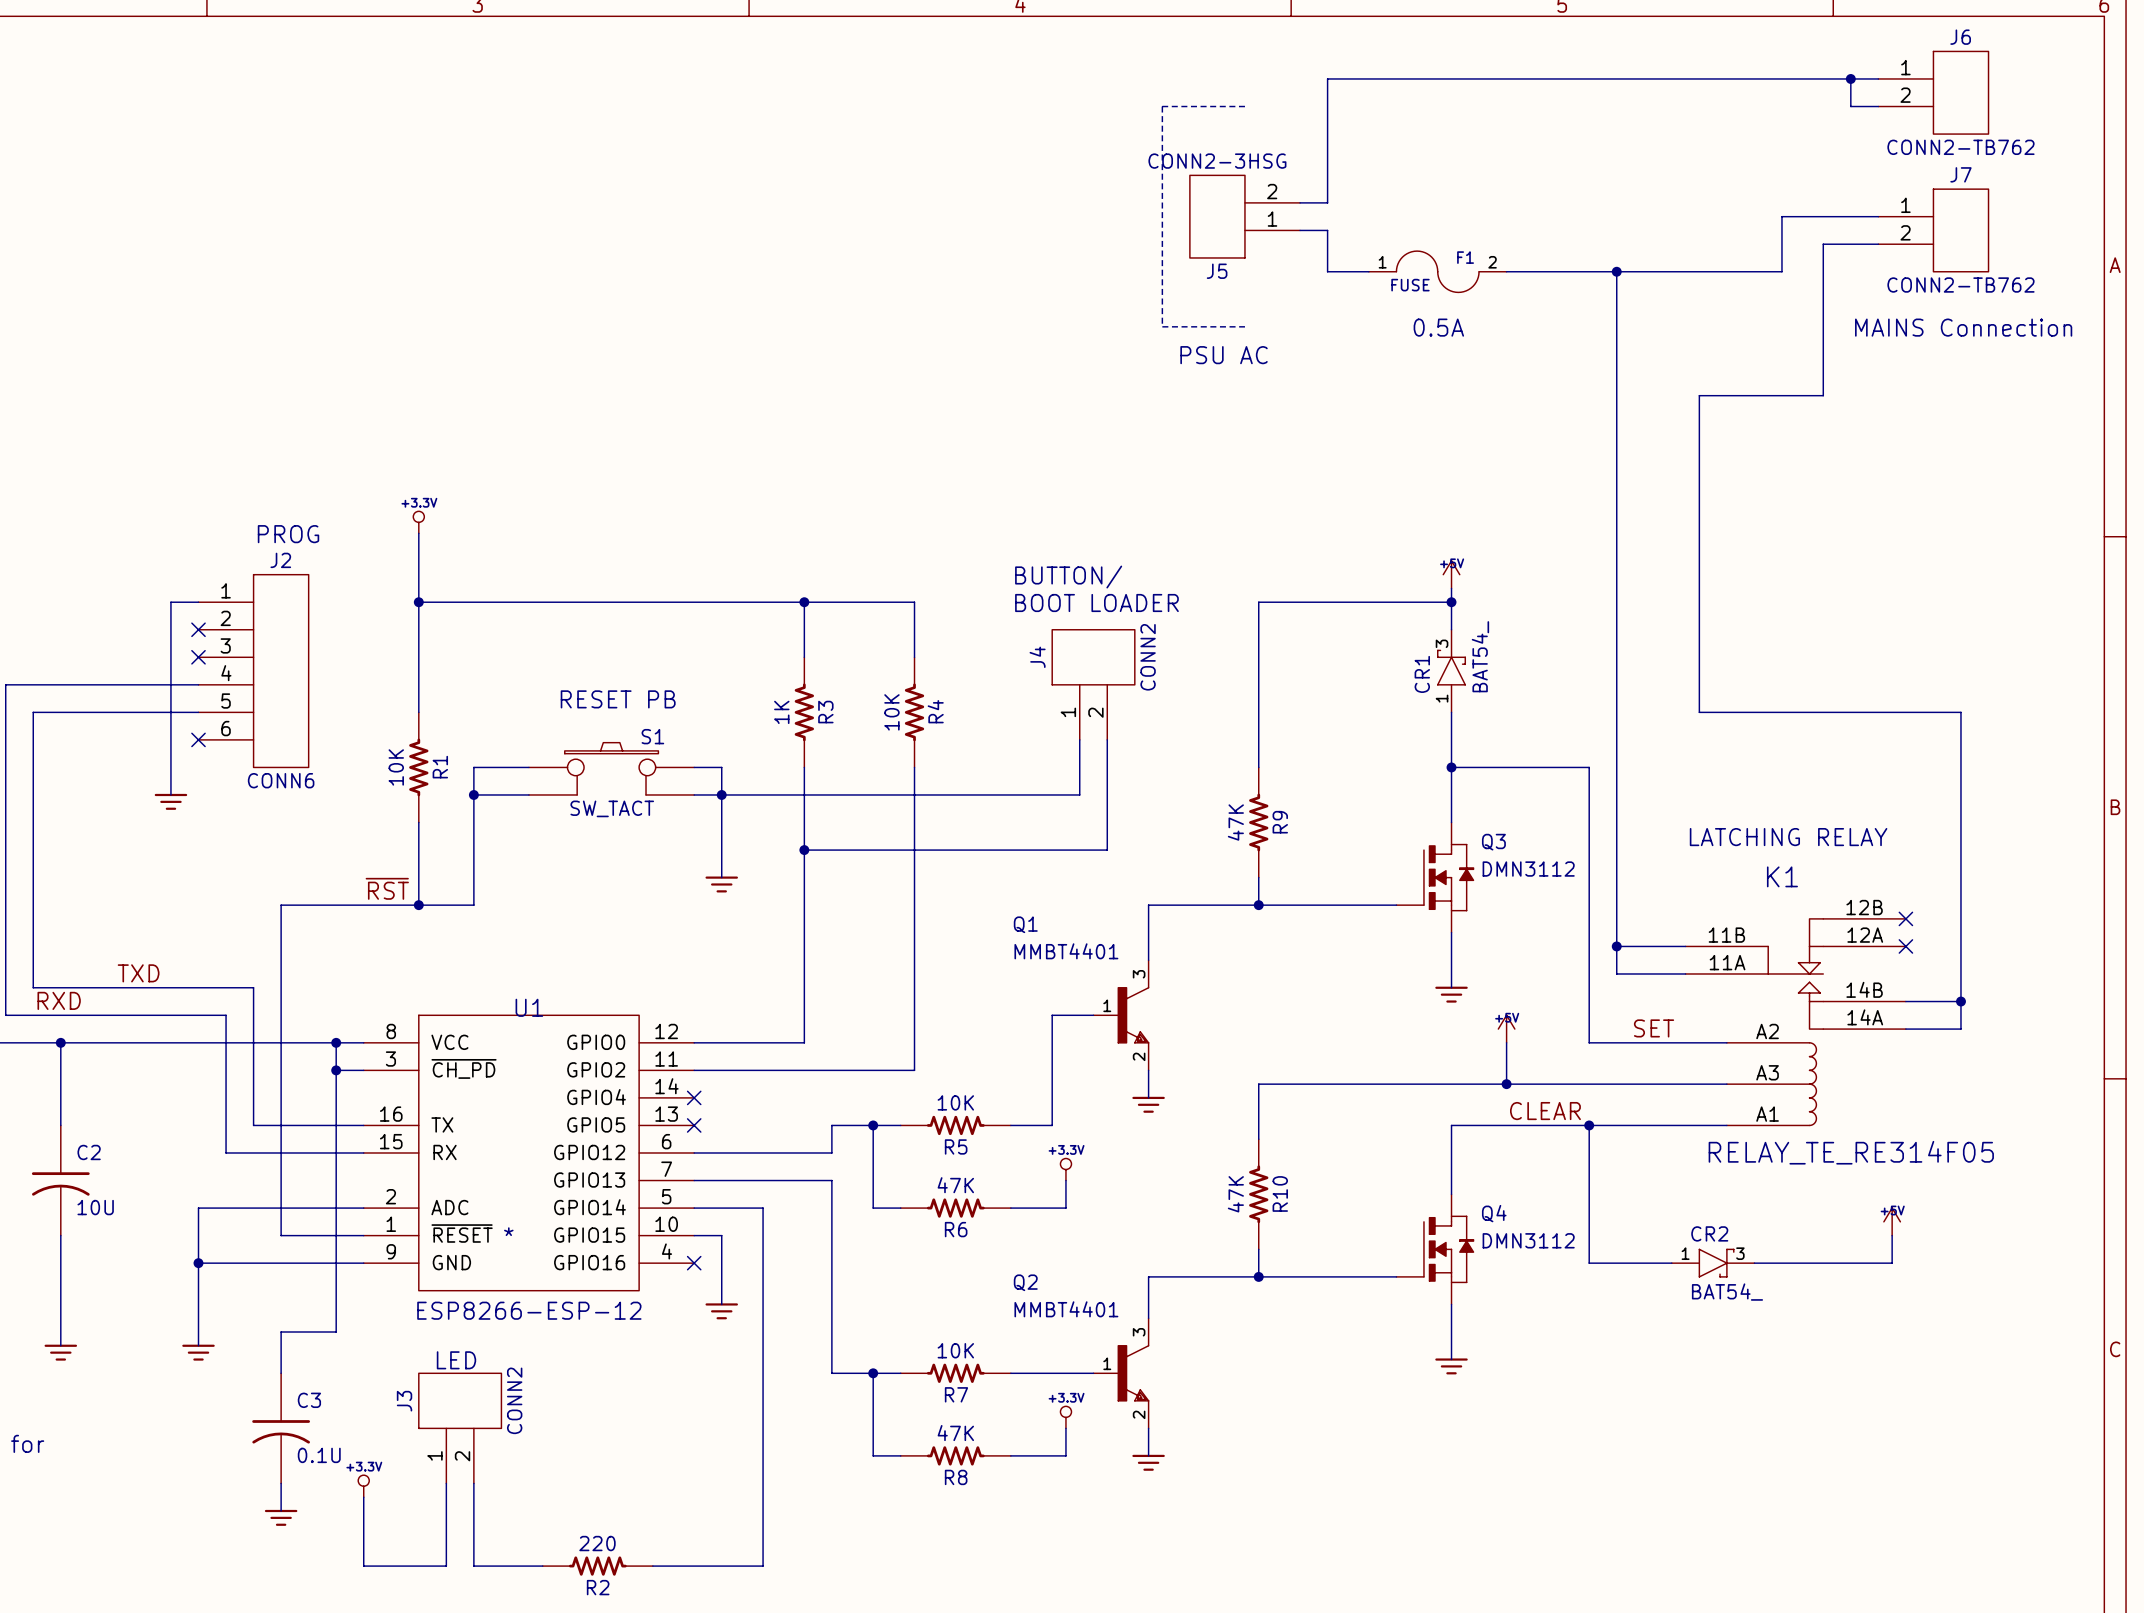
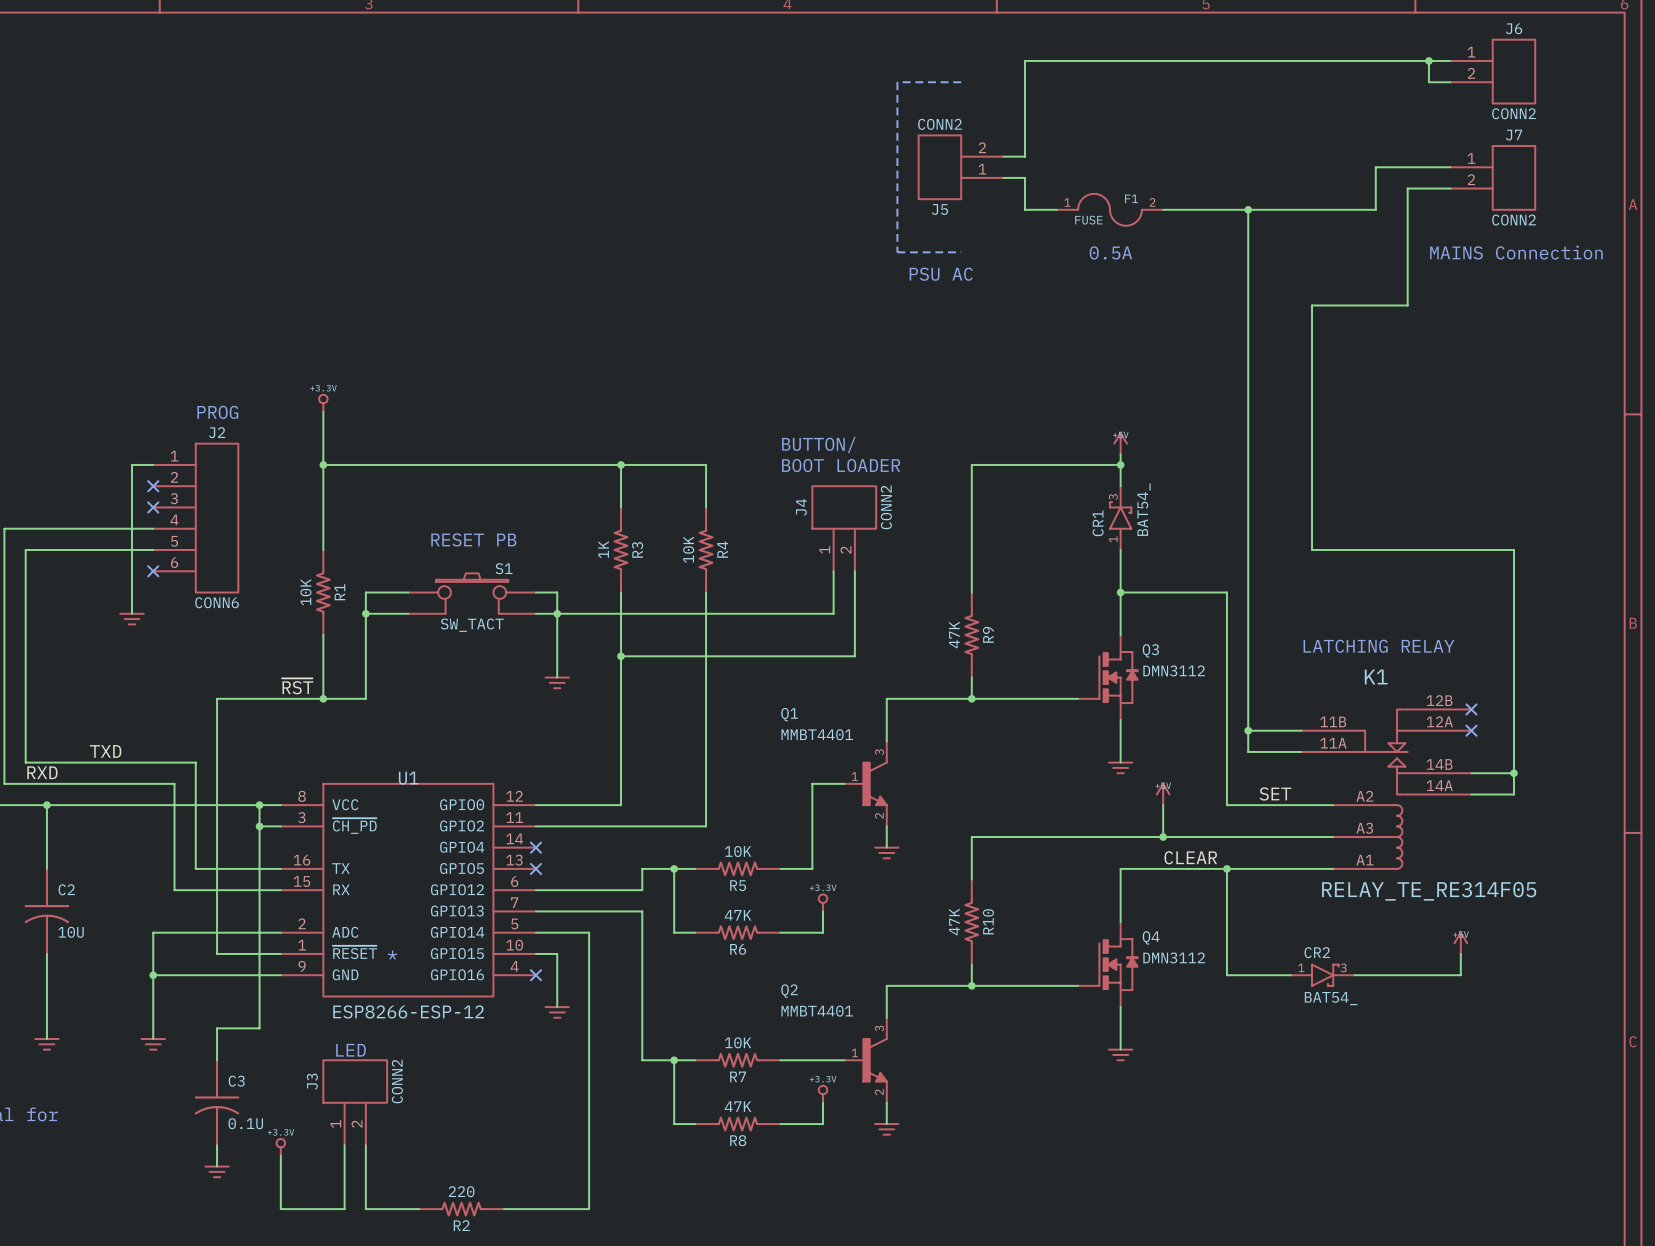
J6 value: CONN2-TB762 (1960, 147) -> CONN2 (1514, 113)
J5 value: CONN2-3HSG (1217, 161) -> CONN2 (939, 124)
J7 value: CONN2-TB762 (1960, 285) -> CONN2 (1514, 220)

